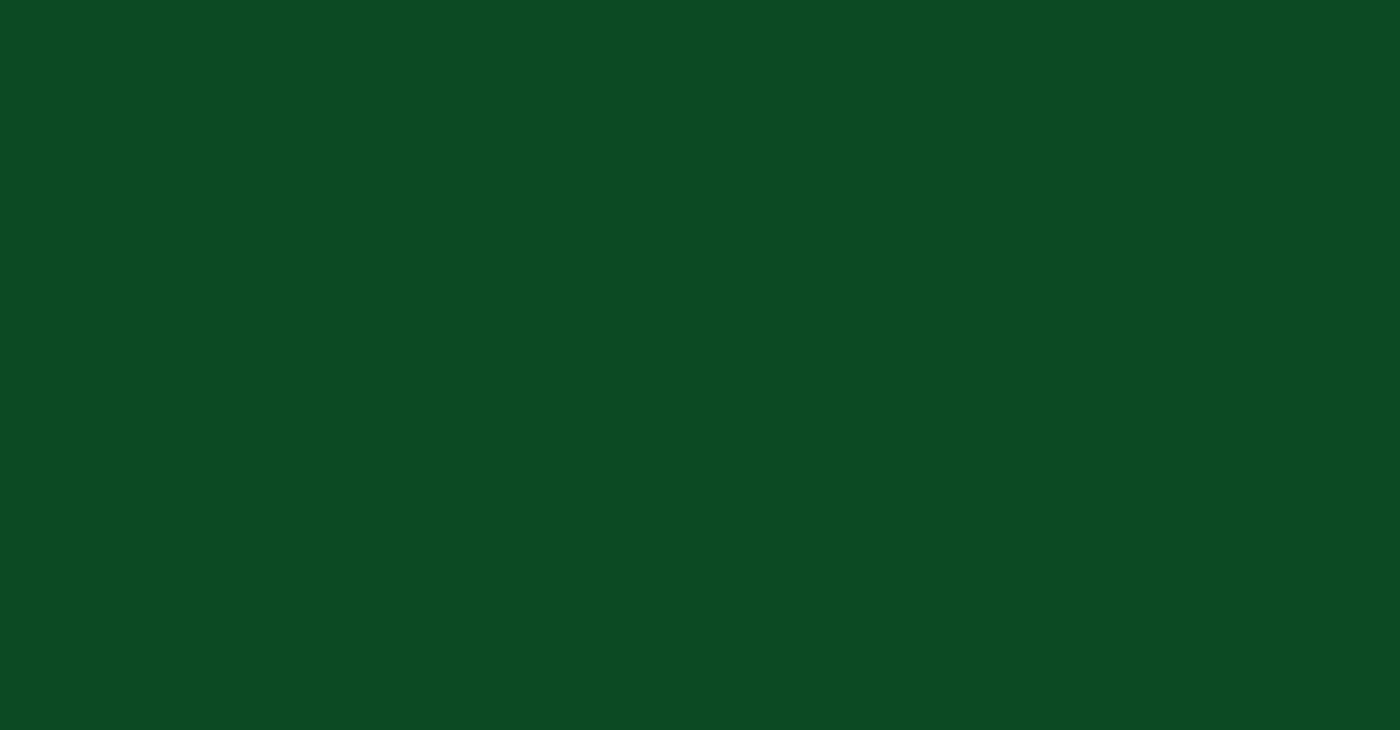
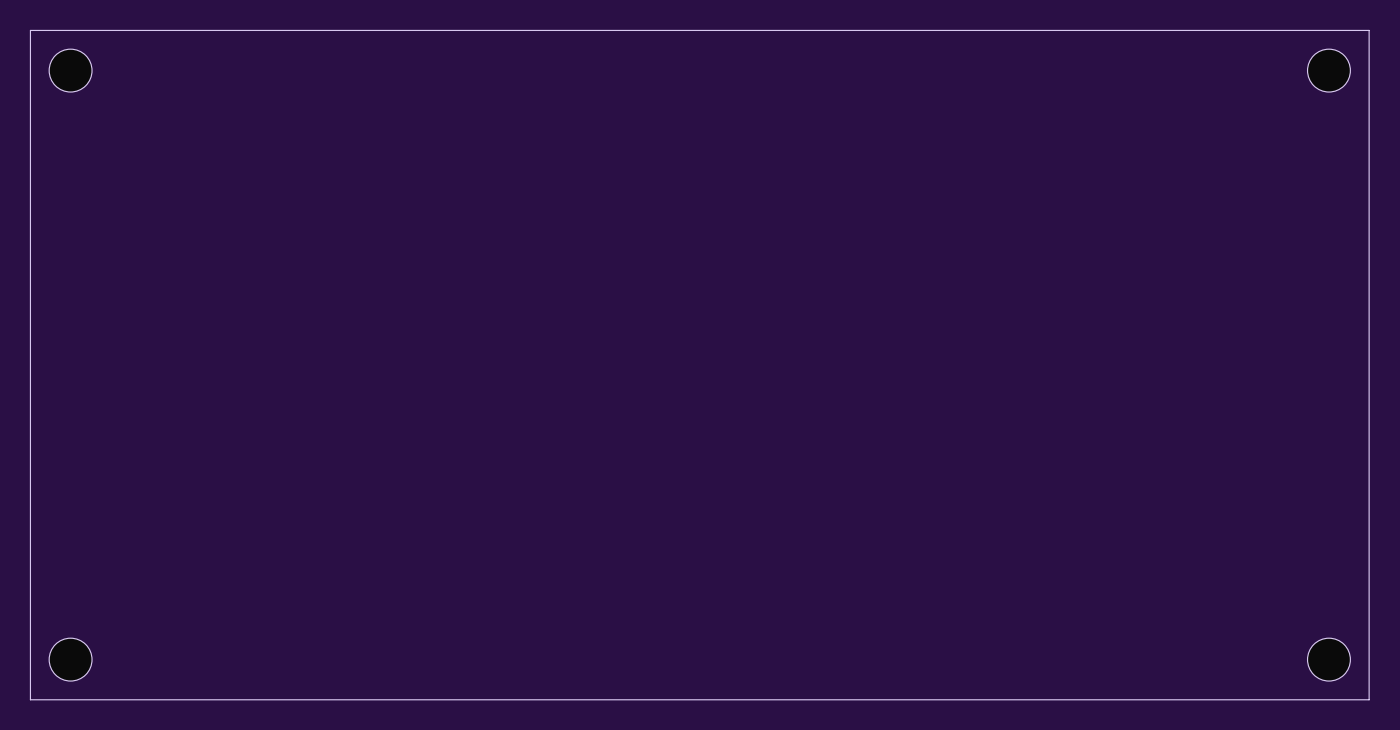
board edge: none -> (30, 30) (1369, 30) (1369, 699) (30, 699) (30, 30)
hole: none -> (70, 70)
hole: none -> (1328, 70)
hole: none -> (70, 659)
hole: none -> (1328, 659)

